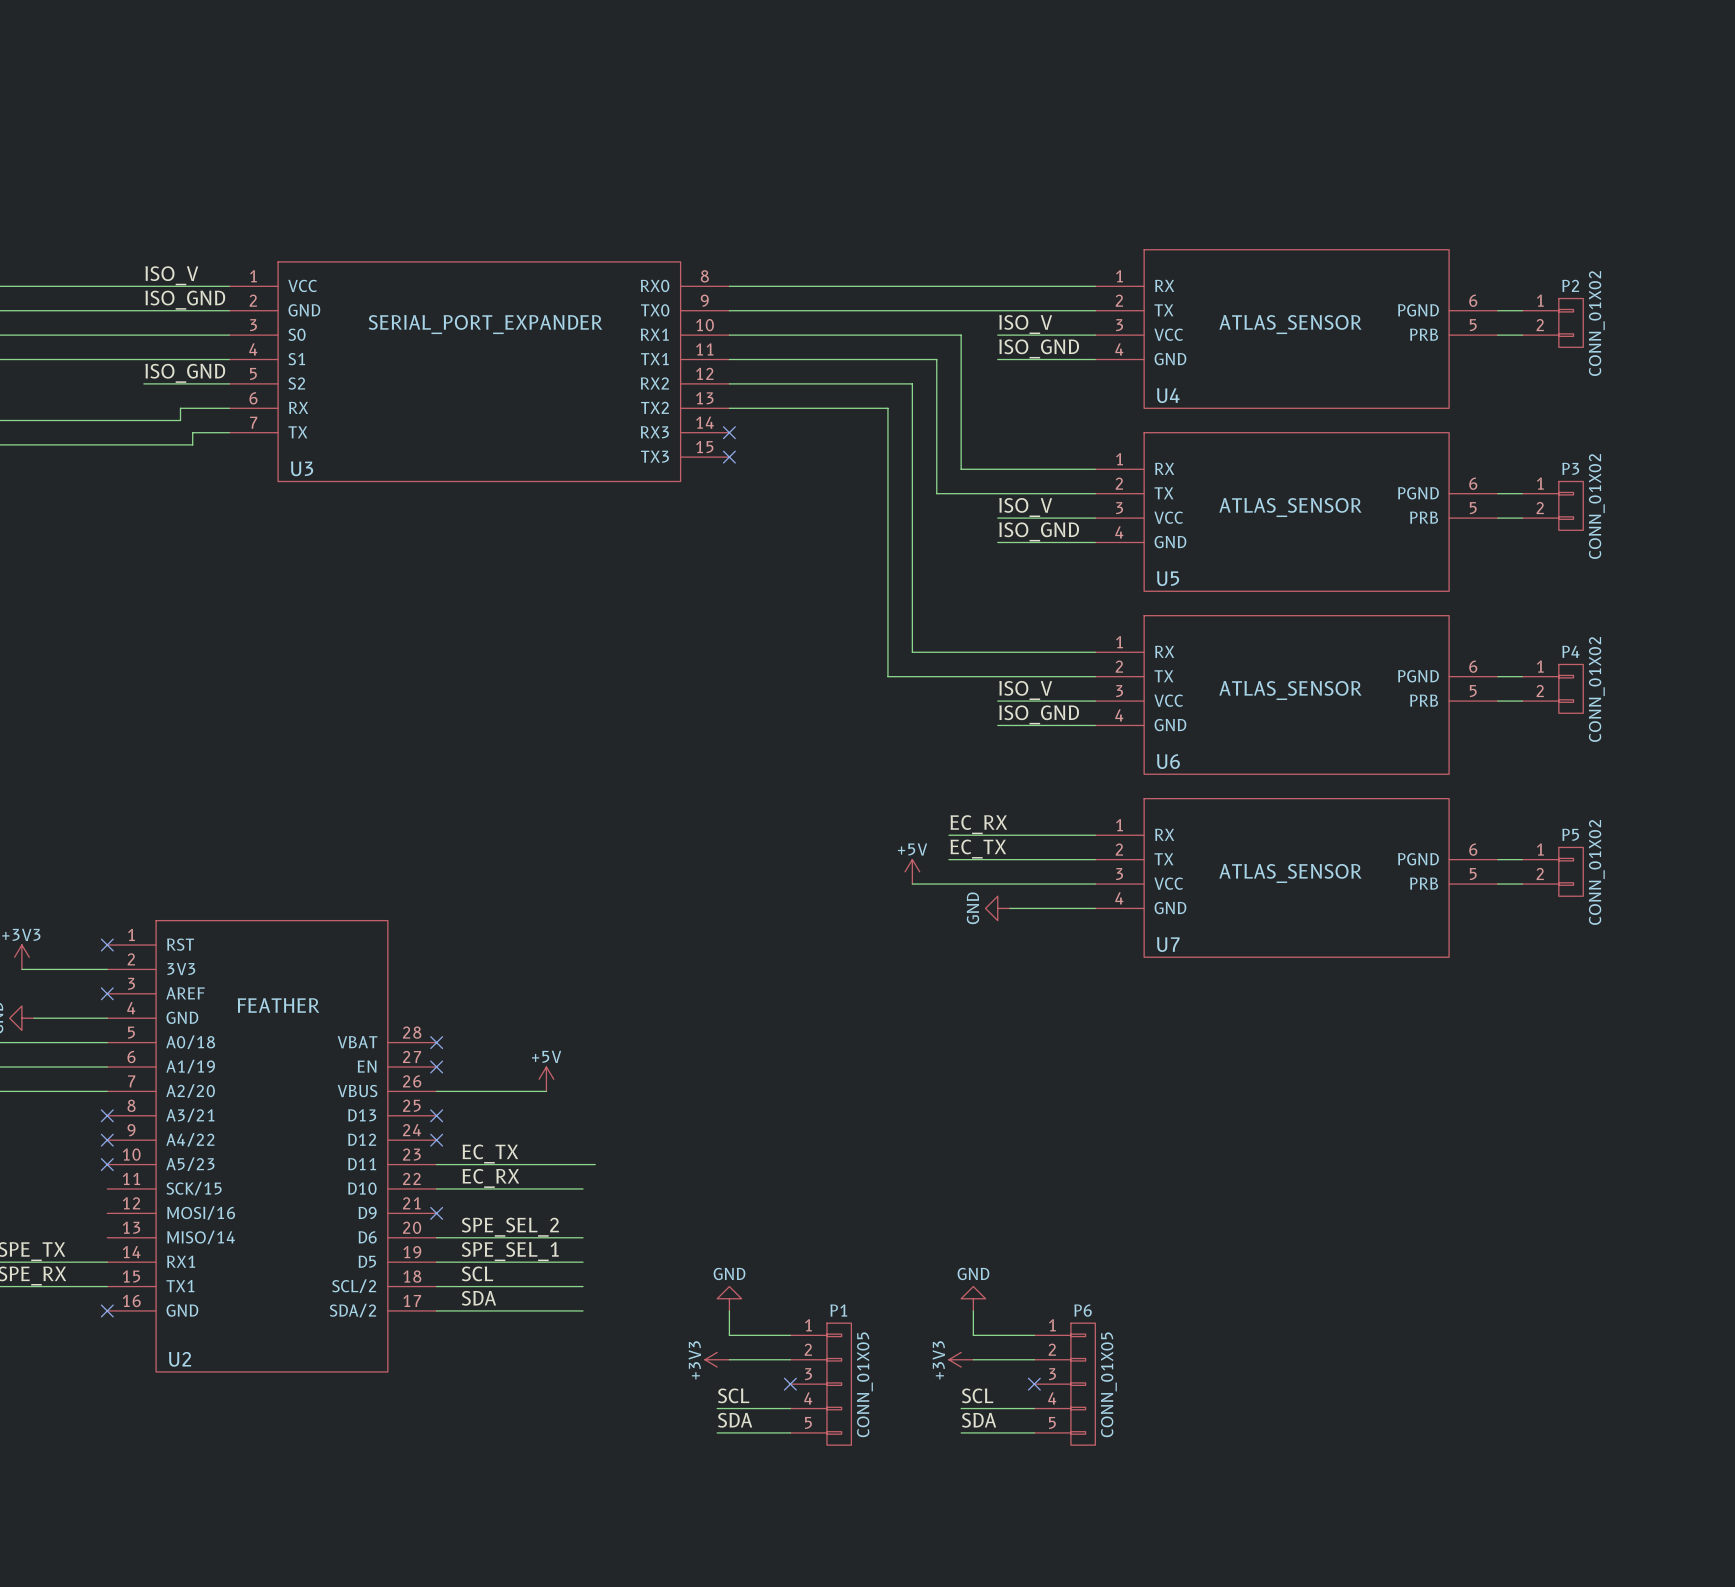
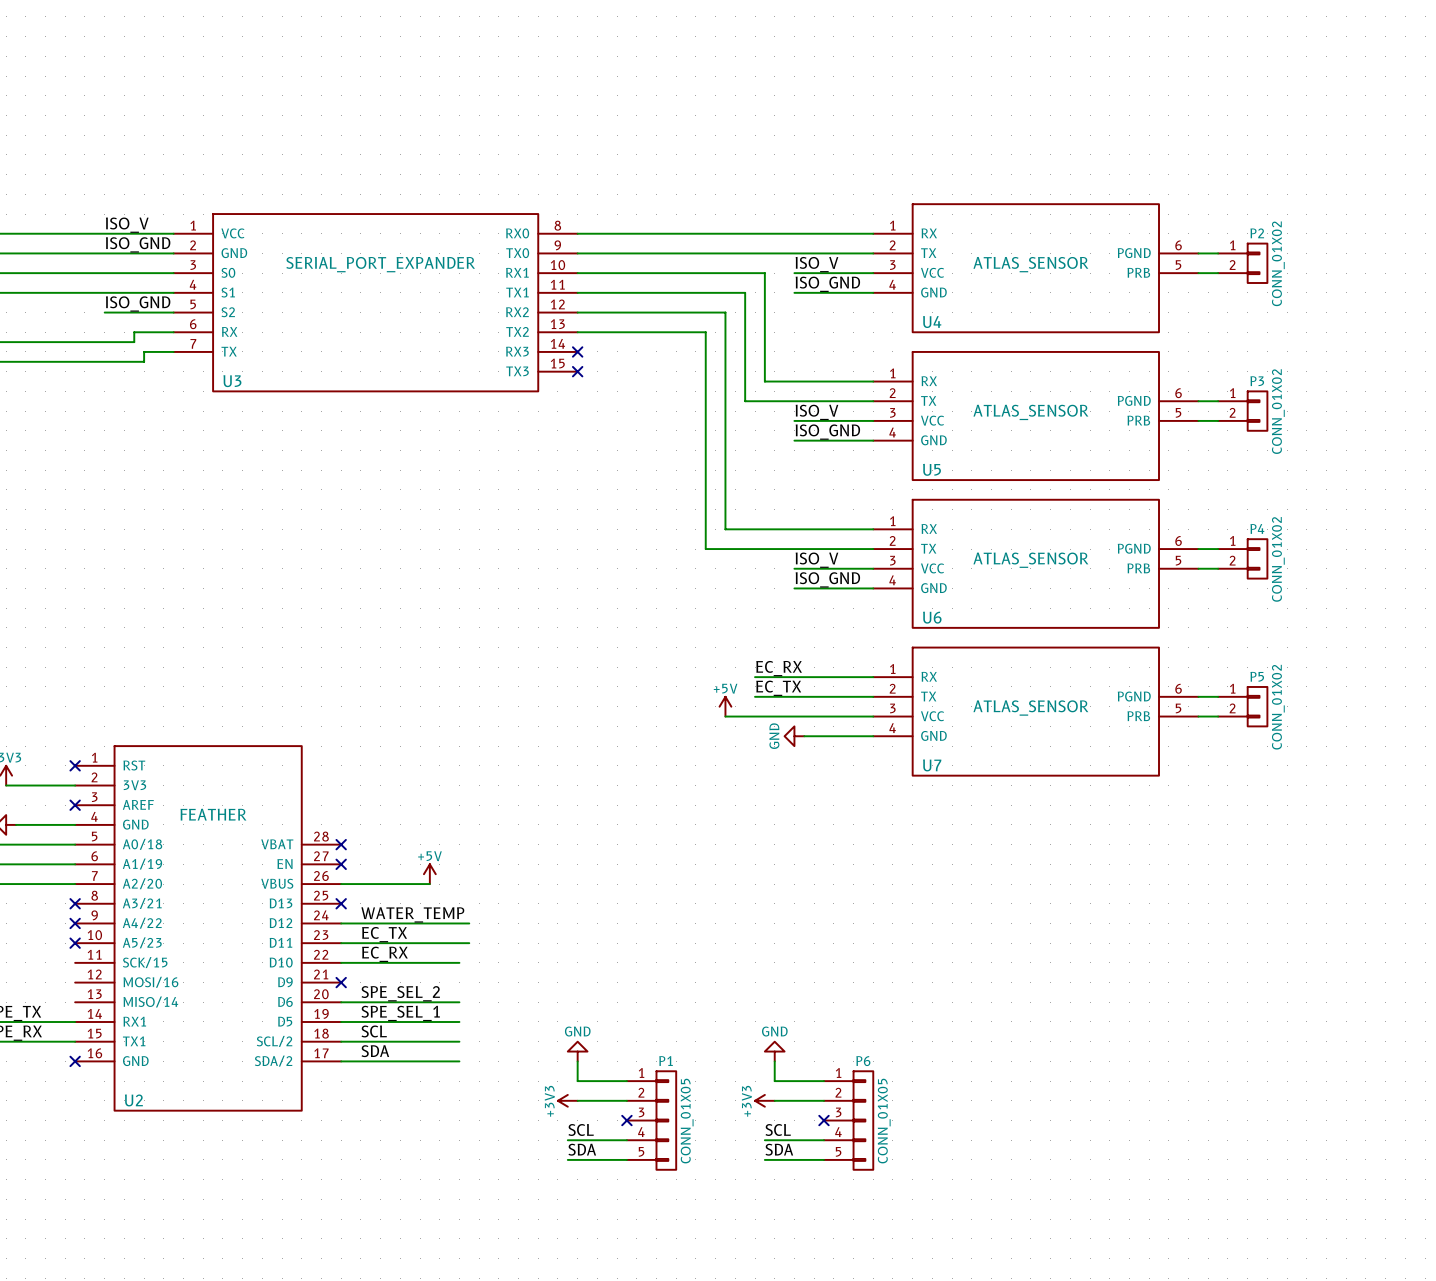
label: none -> WATER_TEMP (412, 914)
wire: none -> (341, 923) (469, 923)
no-connect mark: (436, 1140) -> none

